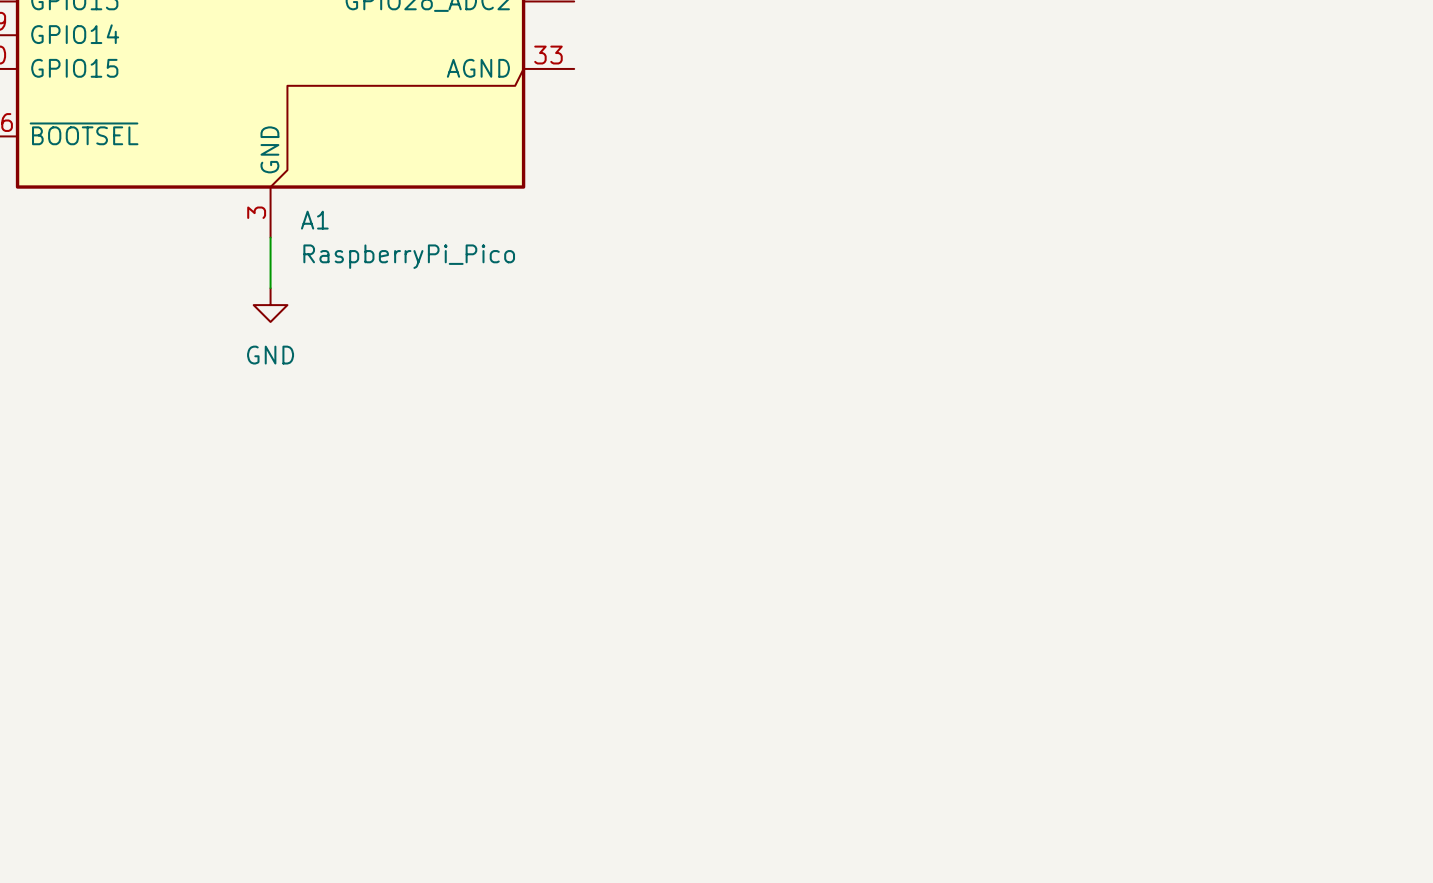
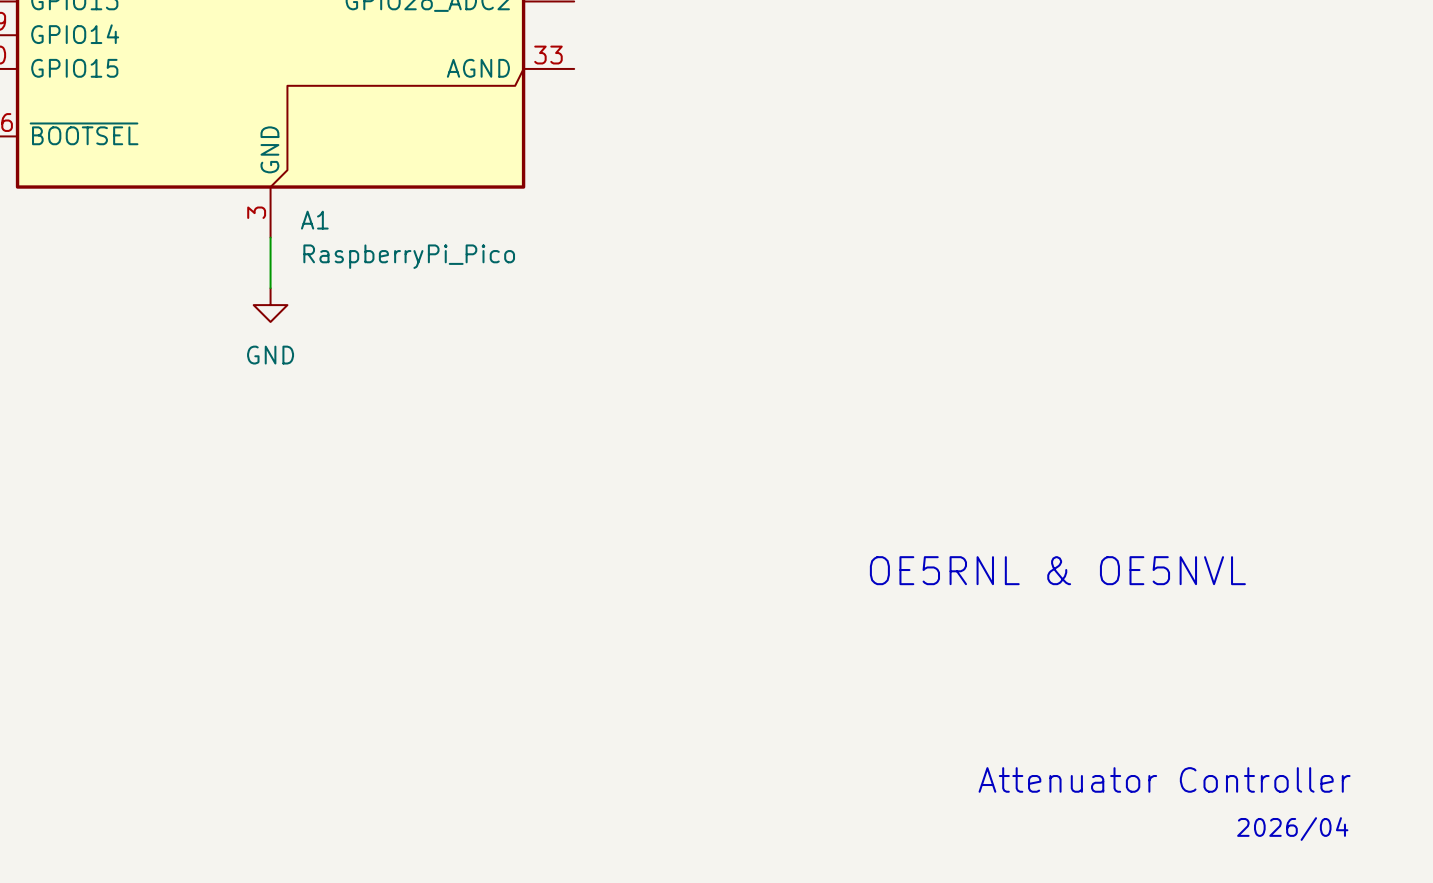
text: none -> OE5RNL & OE5NVL (1057, 570)
text: none -> Attenuator Controller (1164, 779)
text: none -> 2026/04 (1292, 829)

